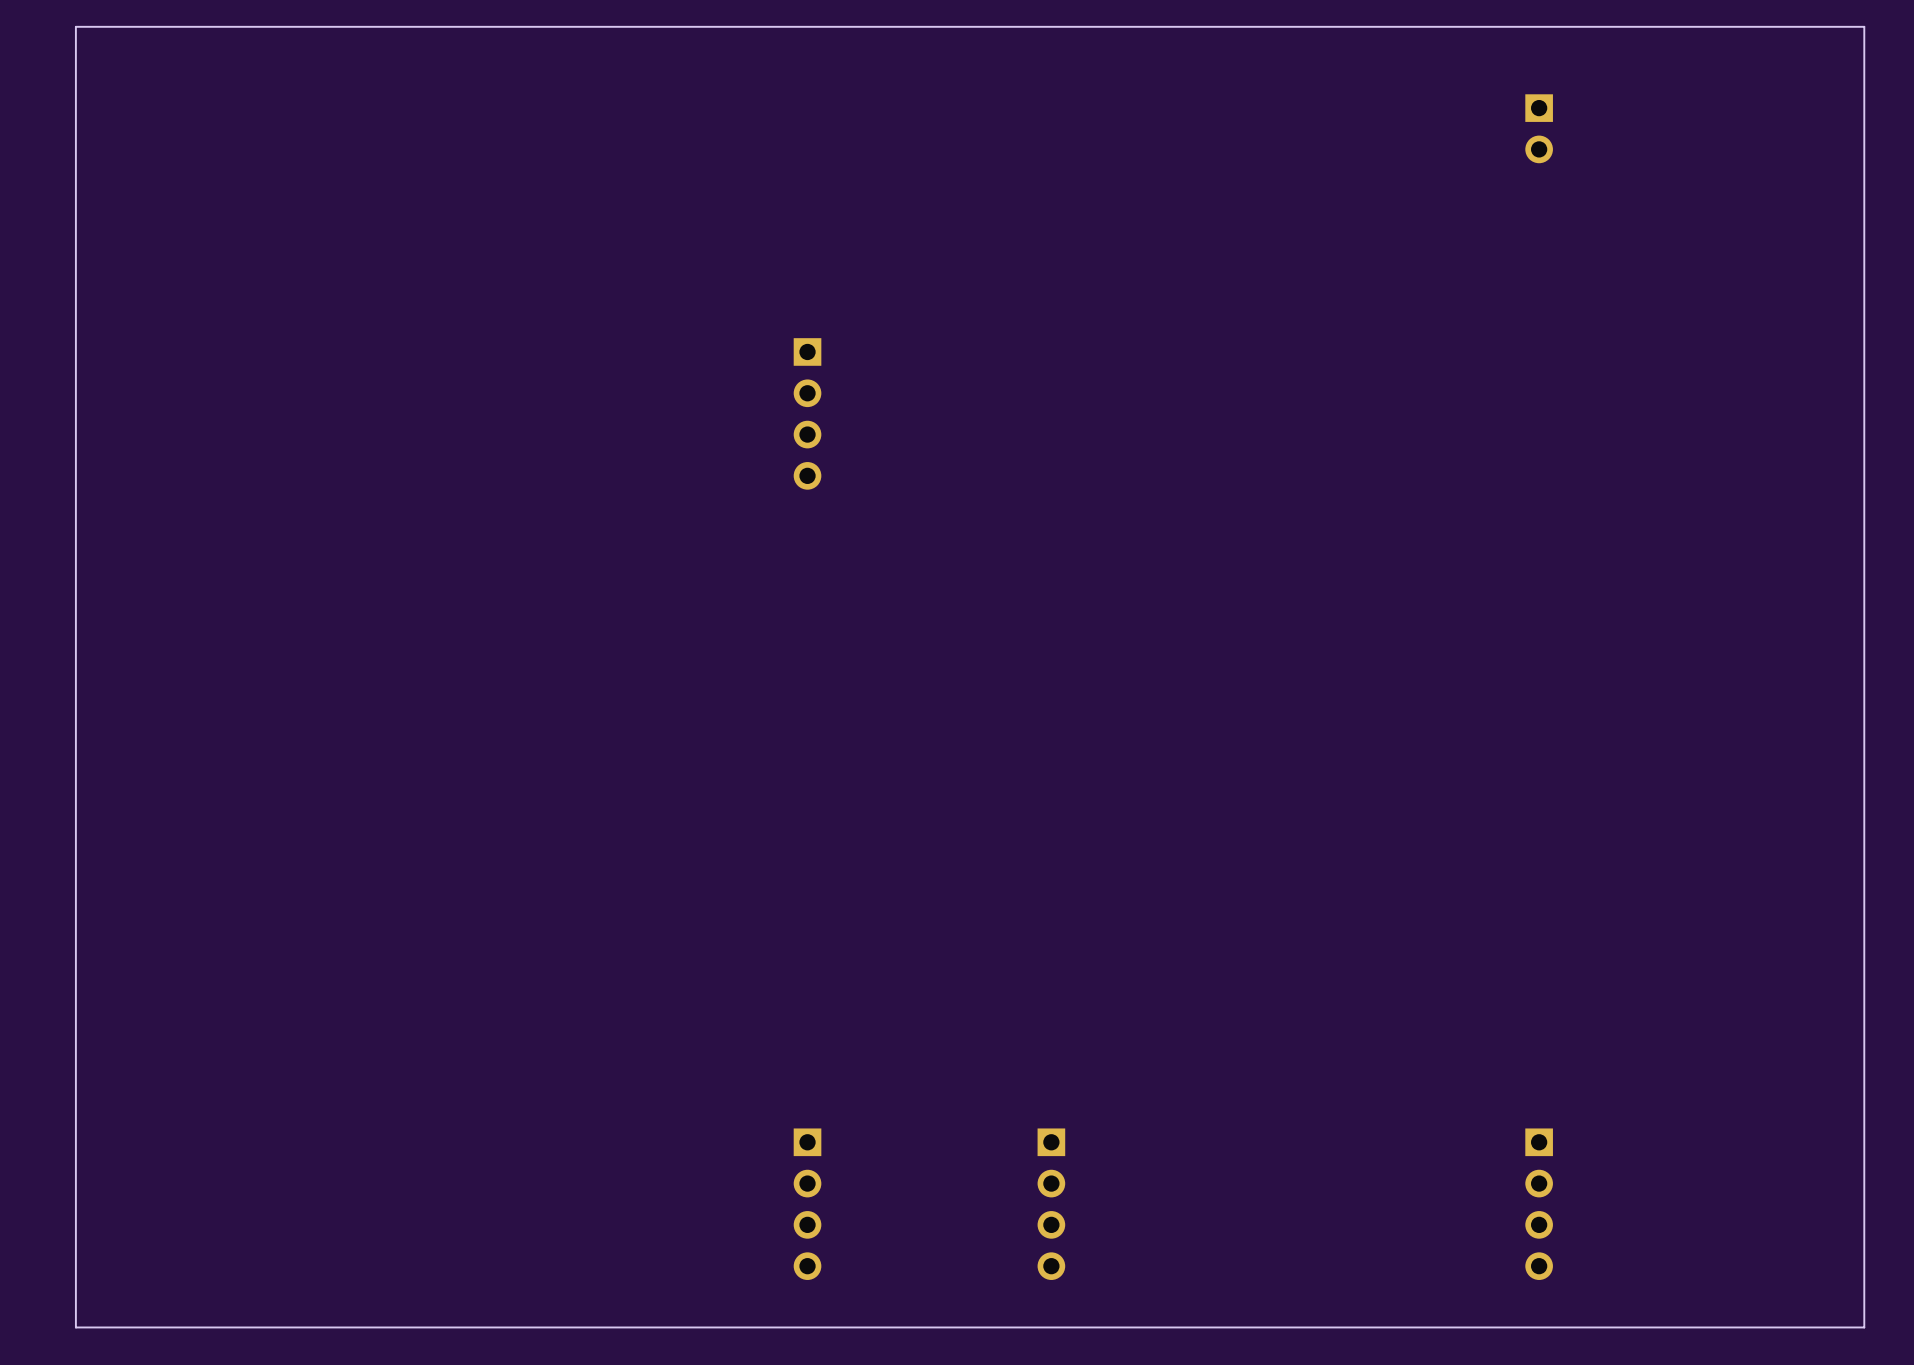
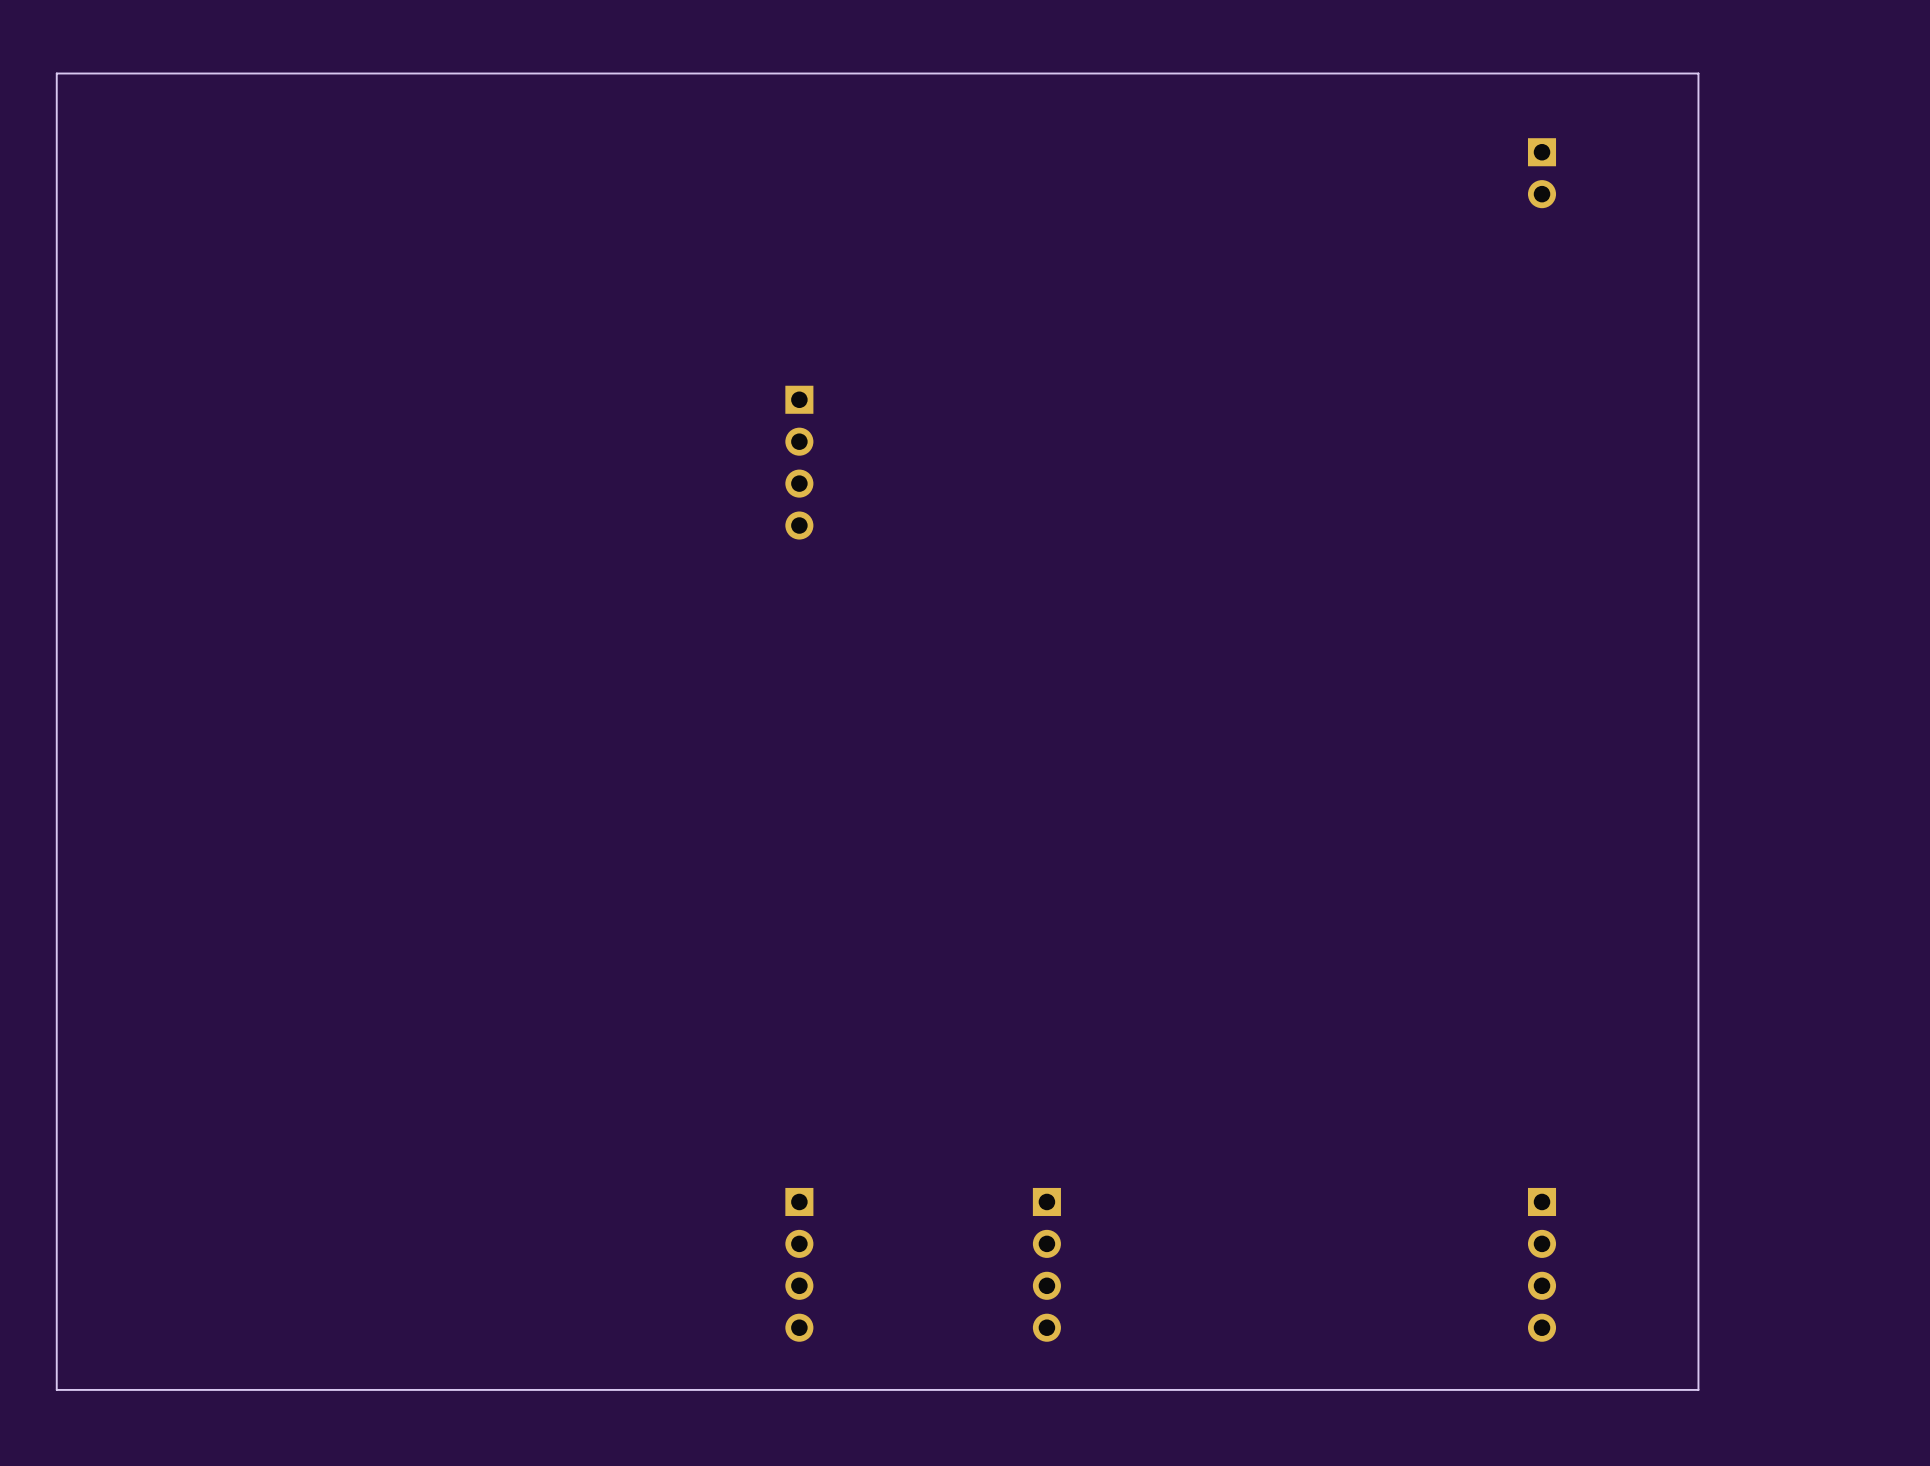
board edge: (75, 30) (75, 26) (1864, 26) (1864, 1327) (1693, 1327) -> (56, 73) (1698, 73) (1698, 1389)

